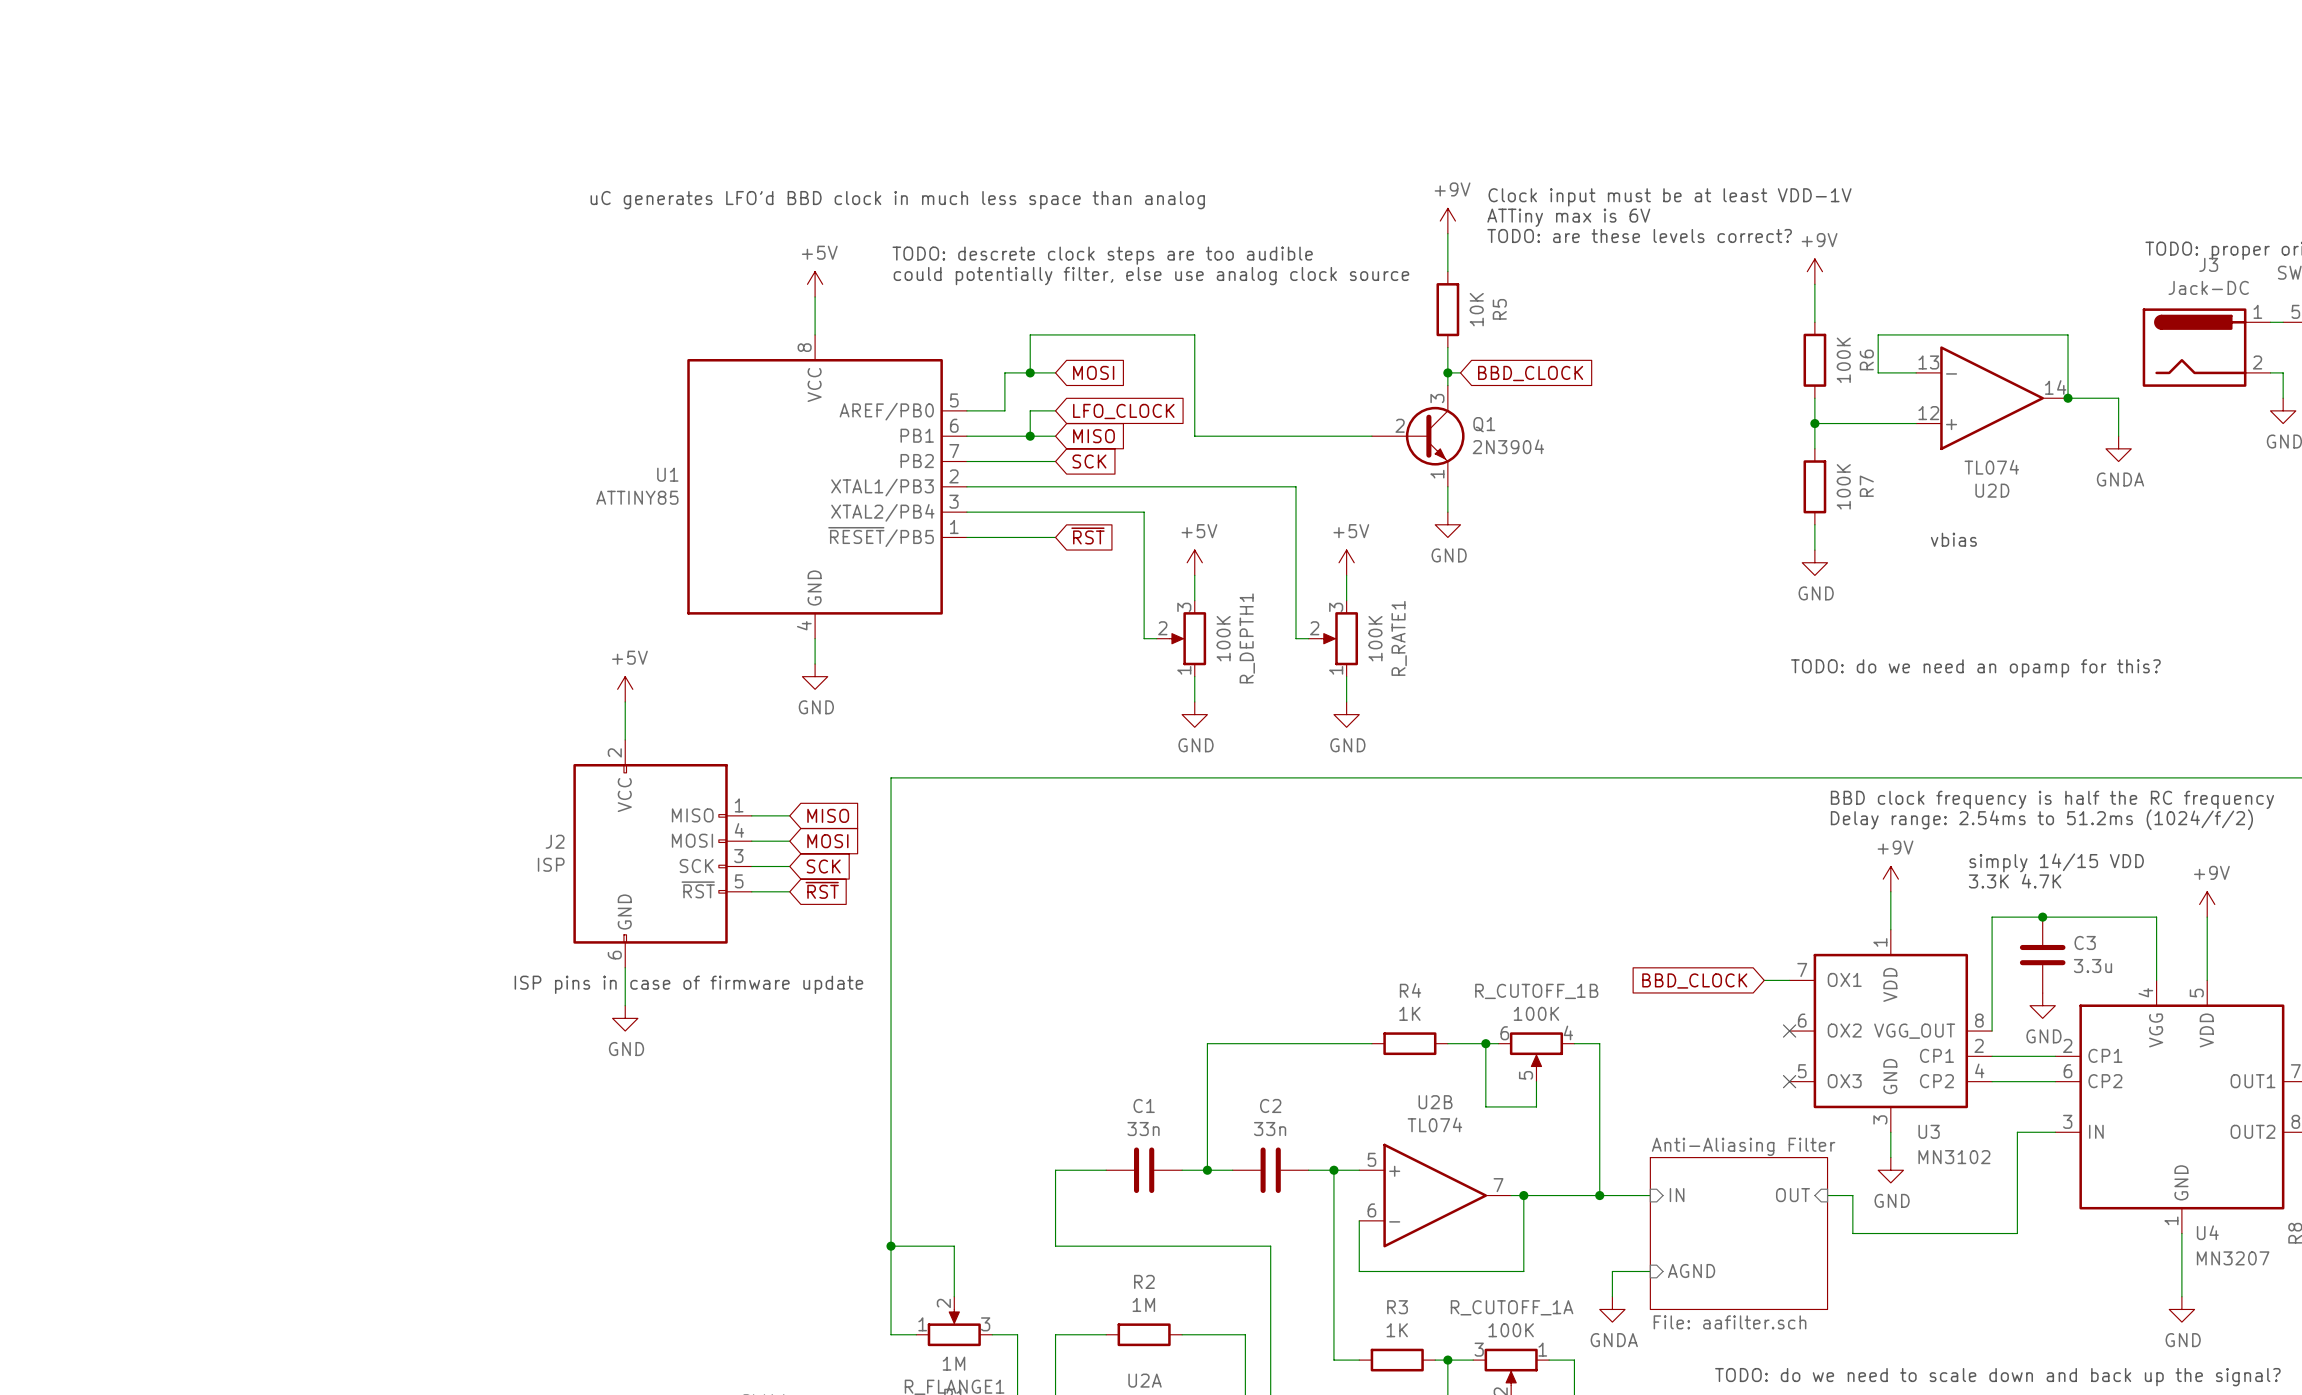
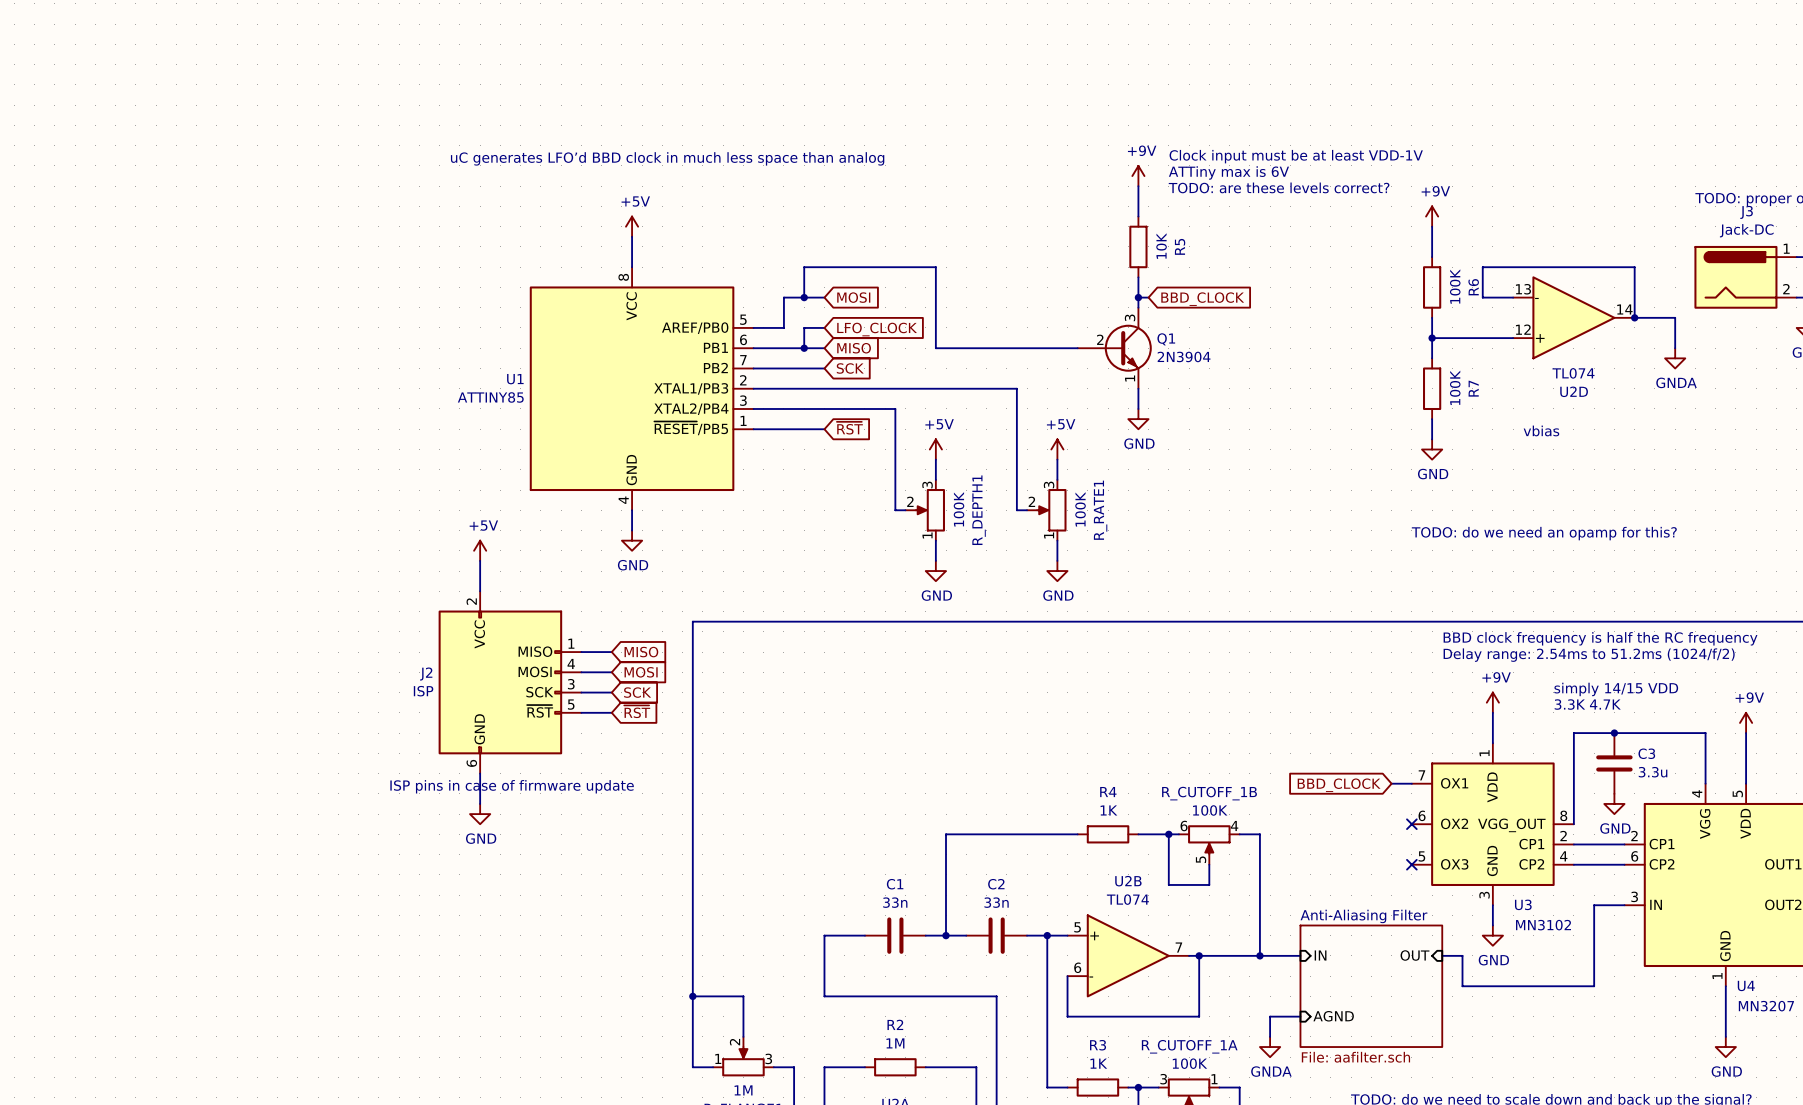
text: TODO: descrete clock steps are too audible (1102, 255) -> none
text: could potentially filter, else use analog clock source (1151, 276) -> none

